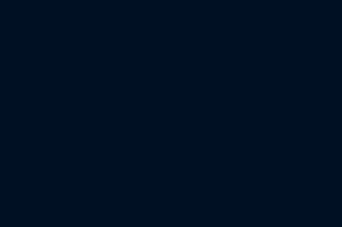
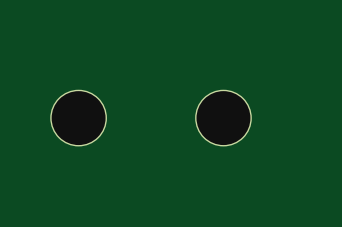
part: none -> (78, 118)
part: none -> (223, 118)

